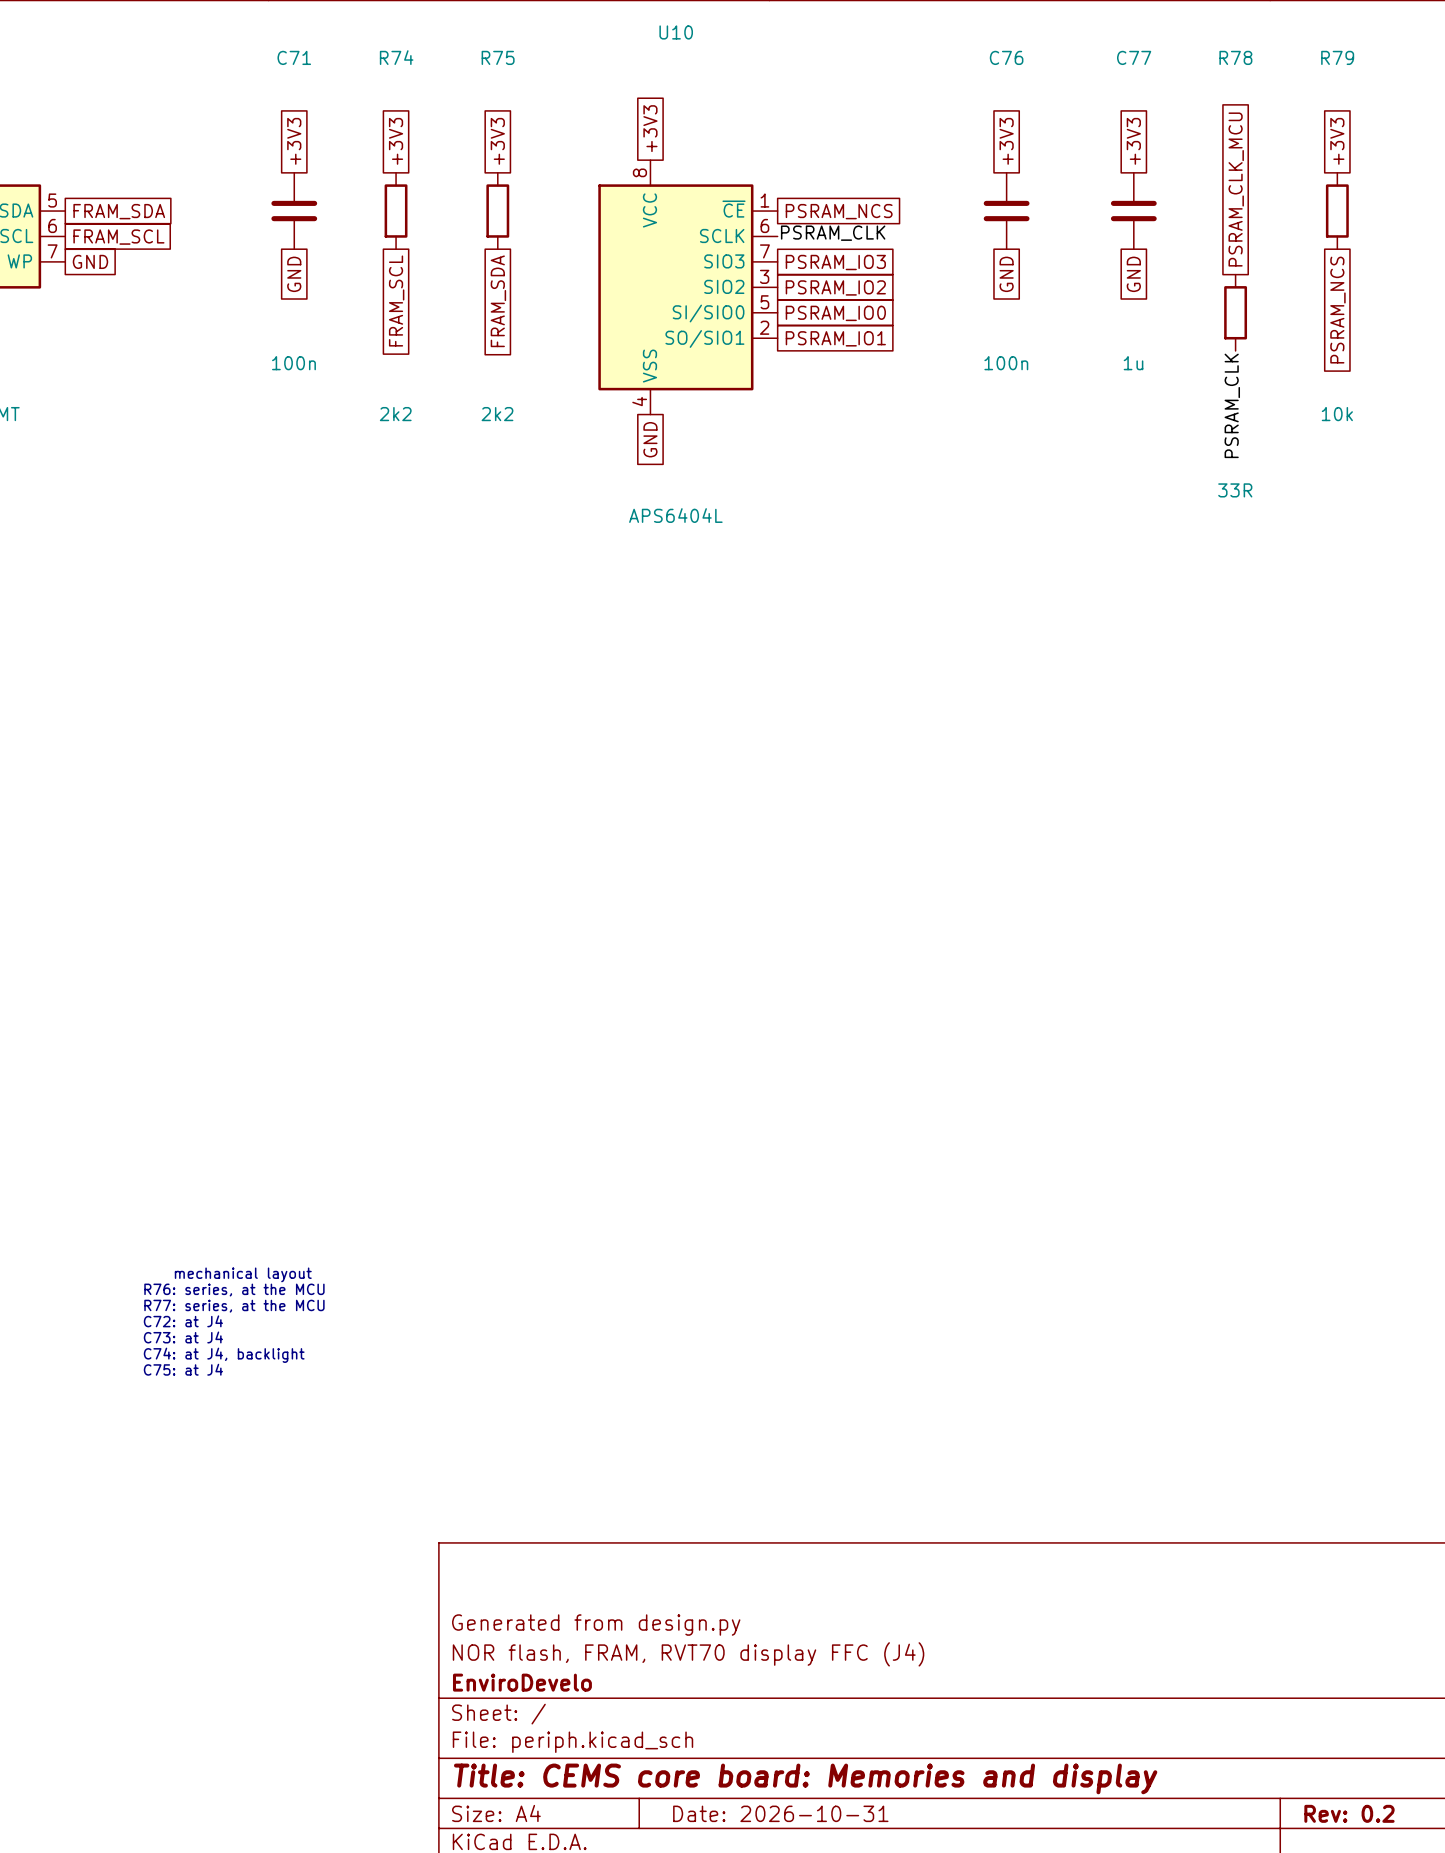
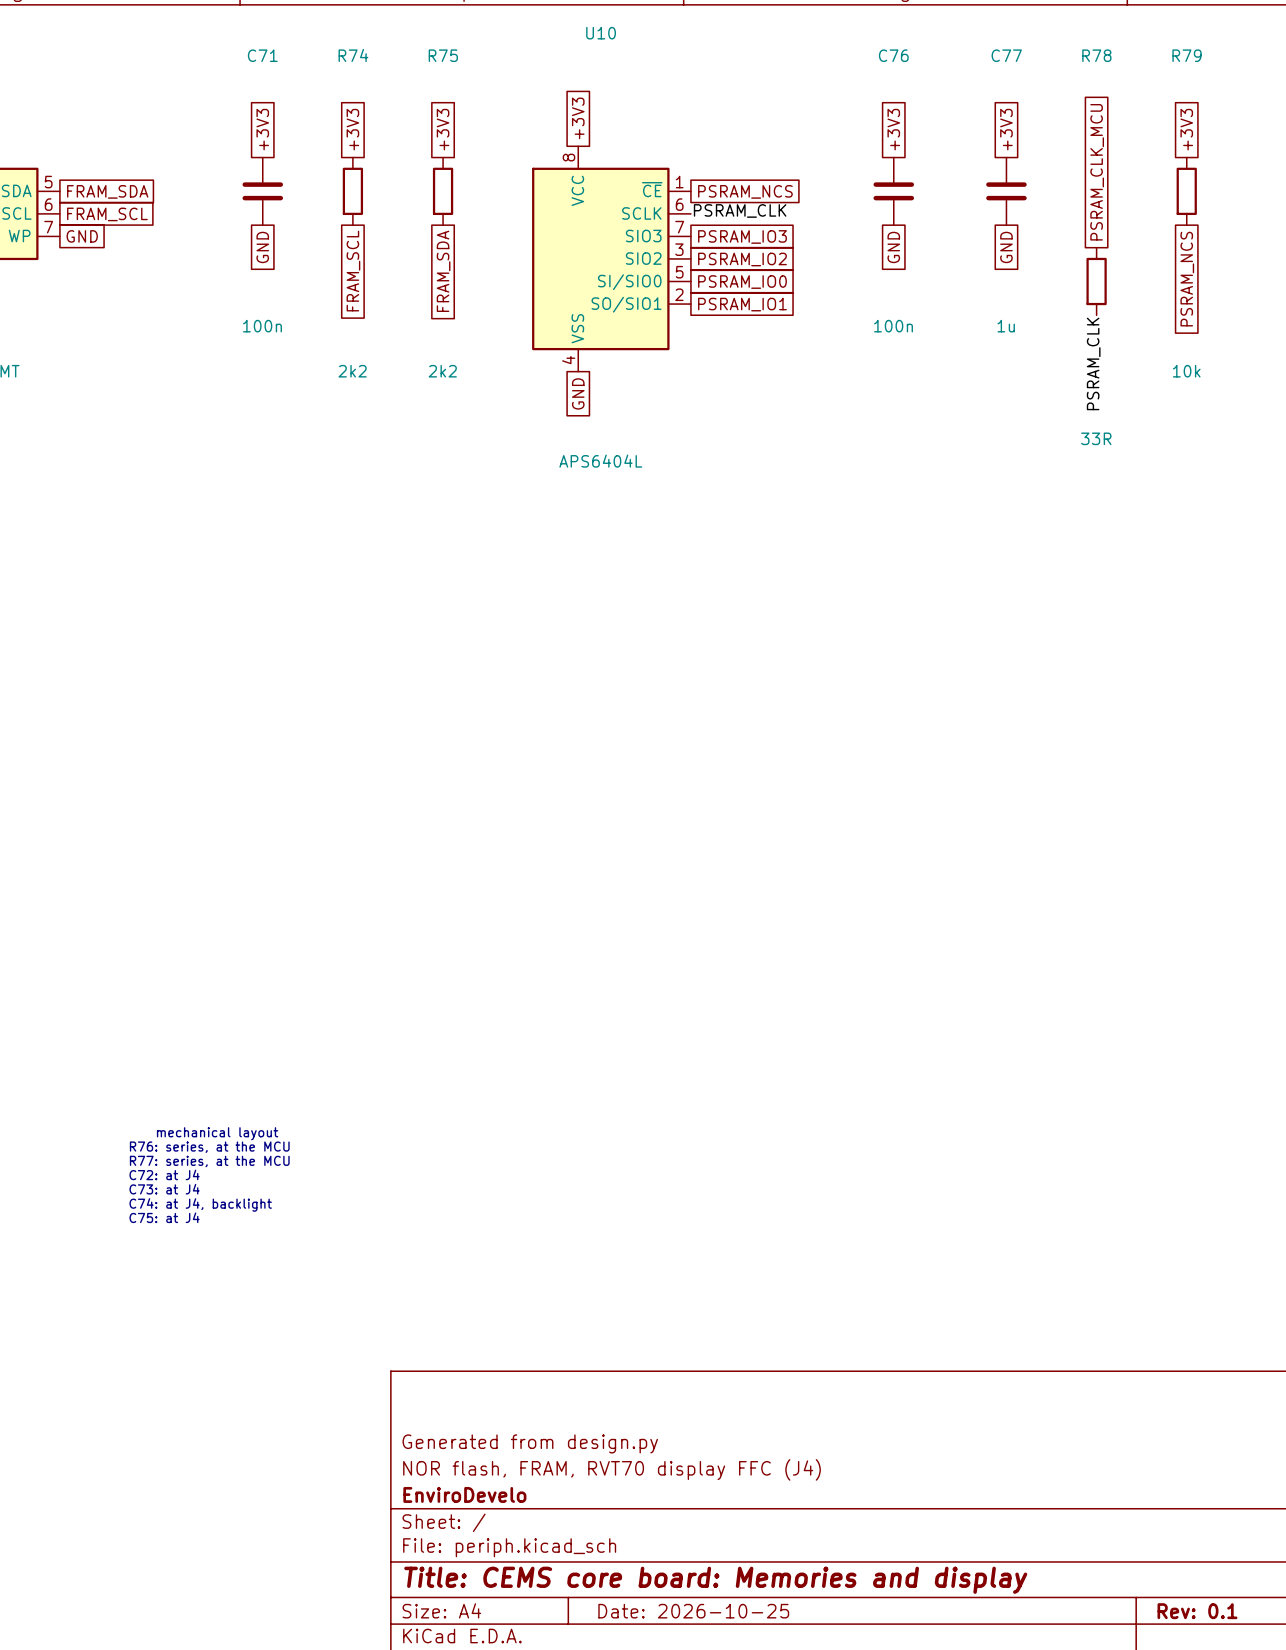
title block: Date: 2026-10-31 (780, 1813) -> Date: 2026-10-25 (693, 1611)
title block: Rev: 0.2 (1349, 1813) -> Rev: 0.1 (1197, 1611)

